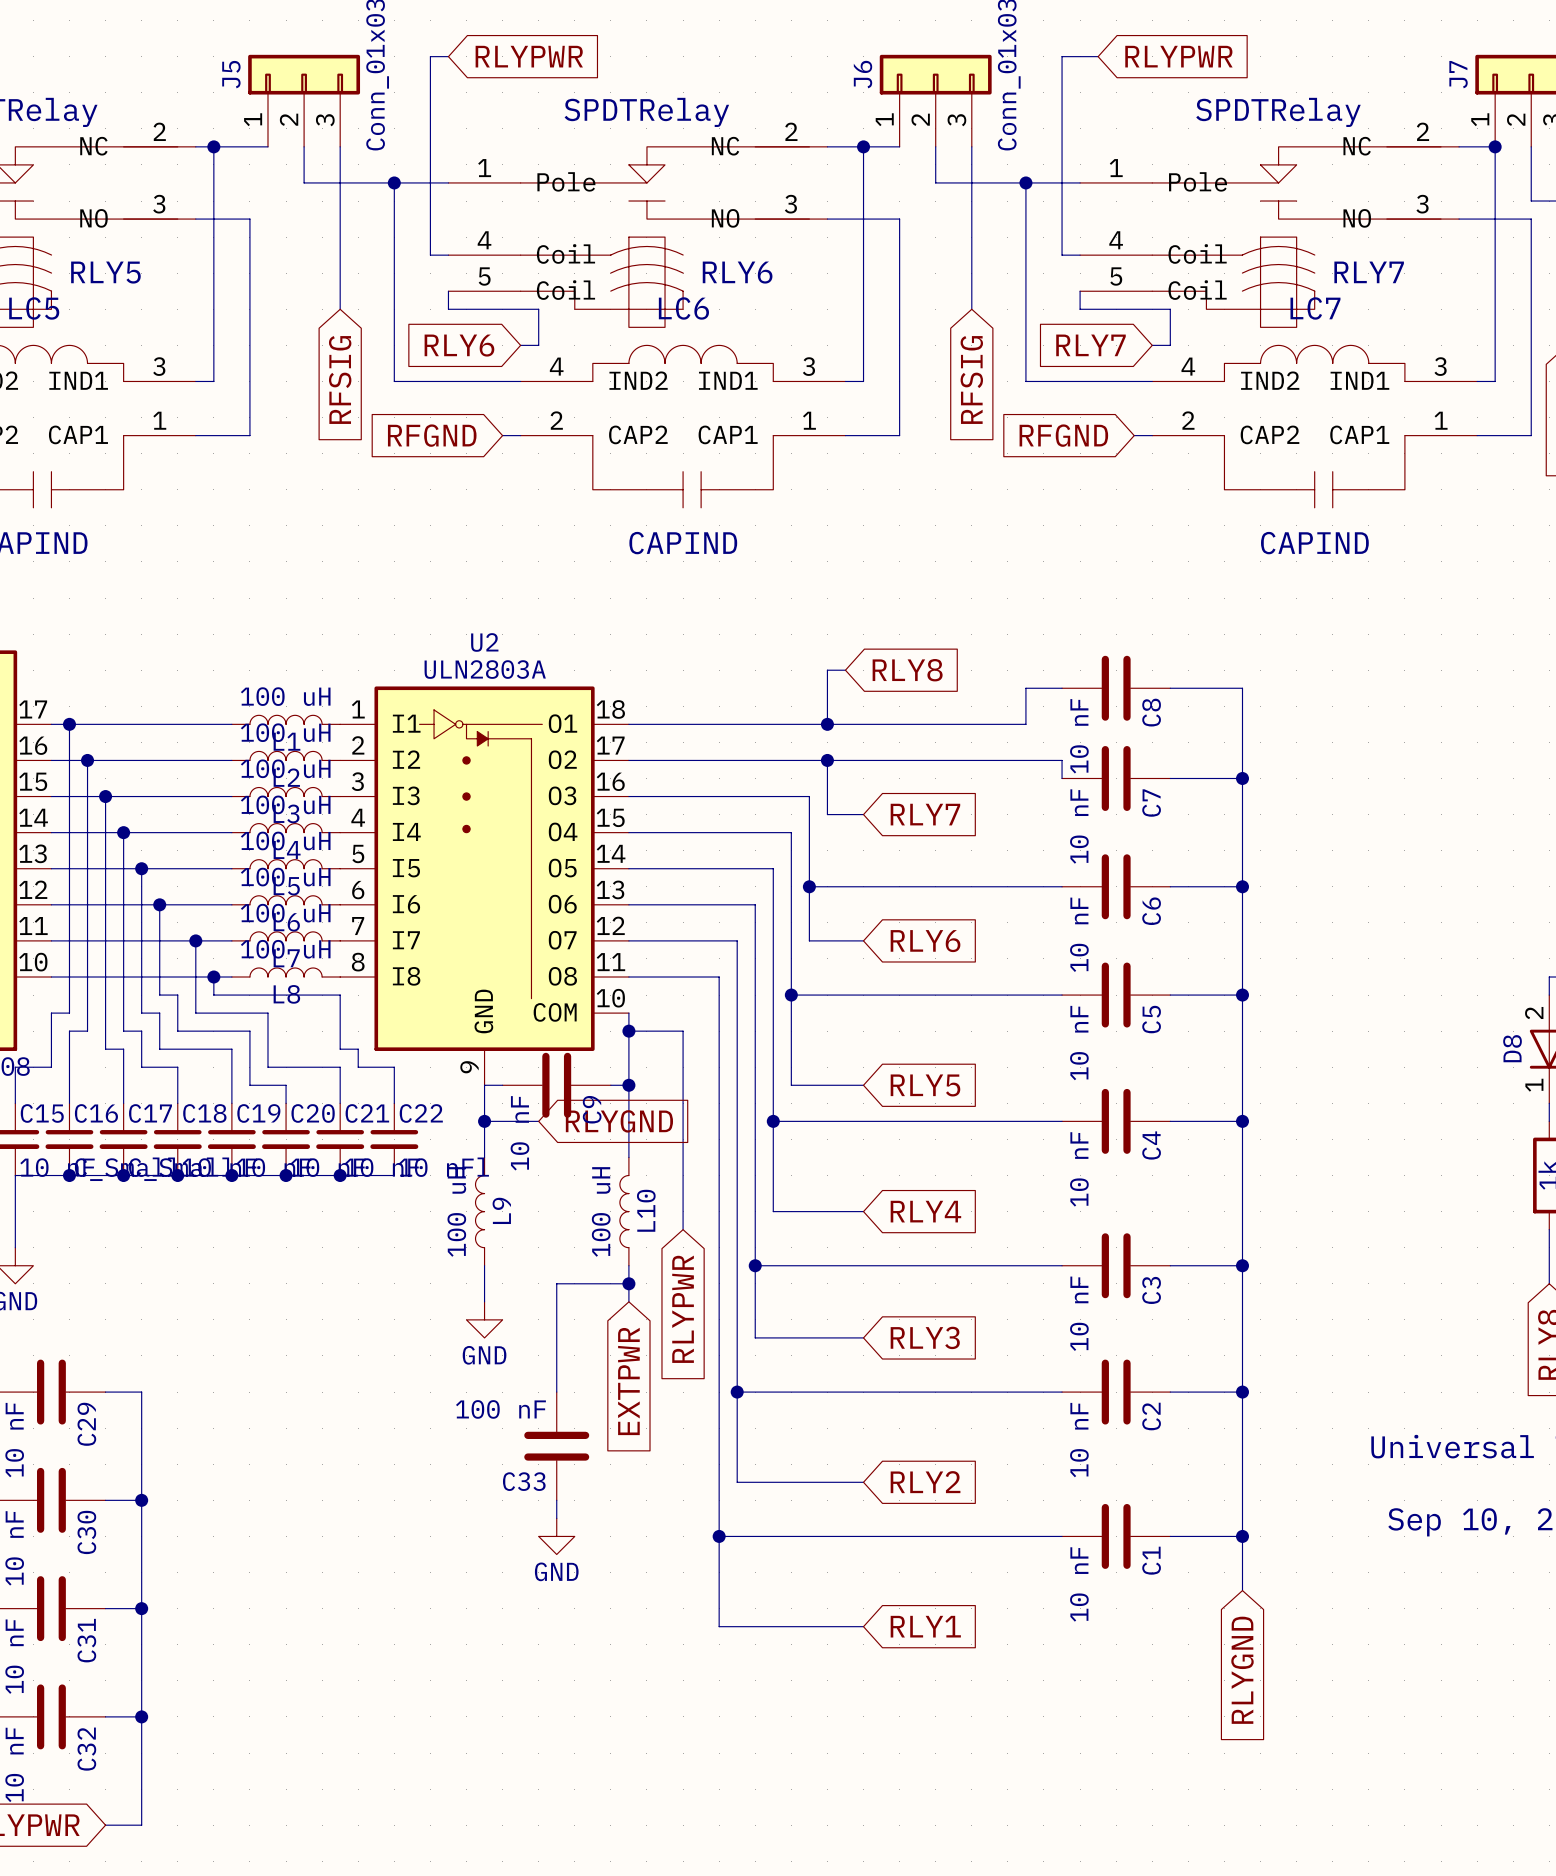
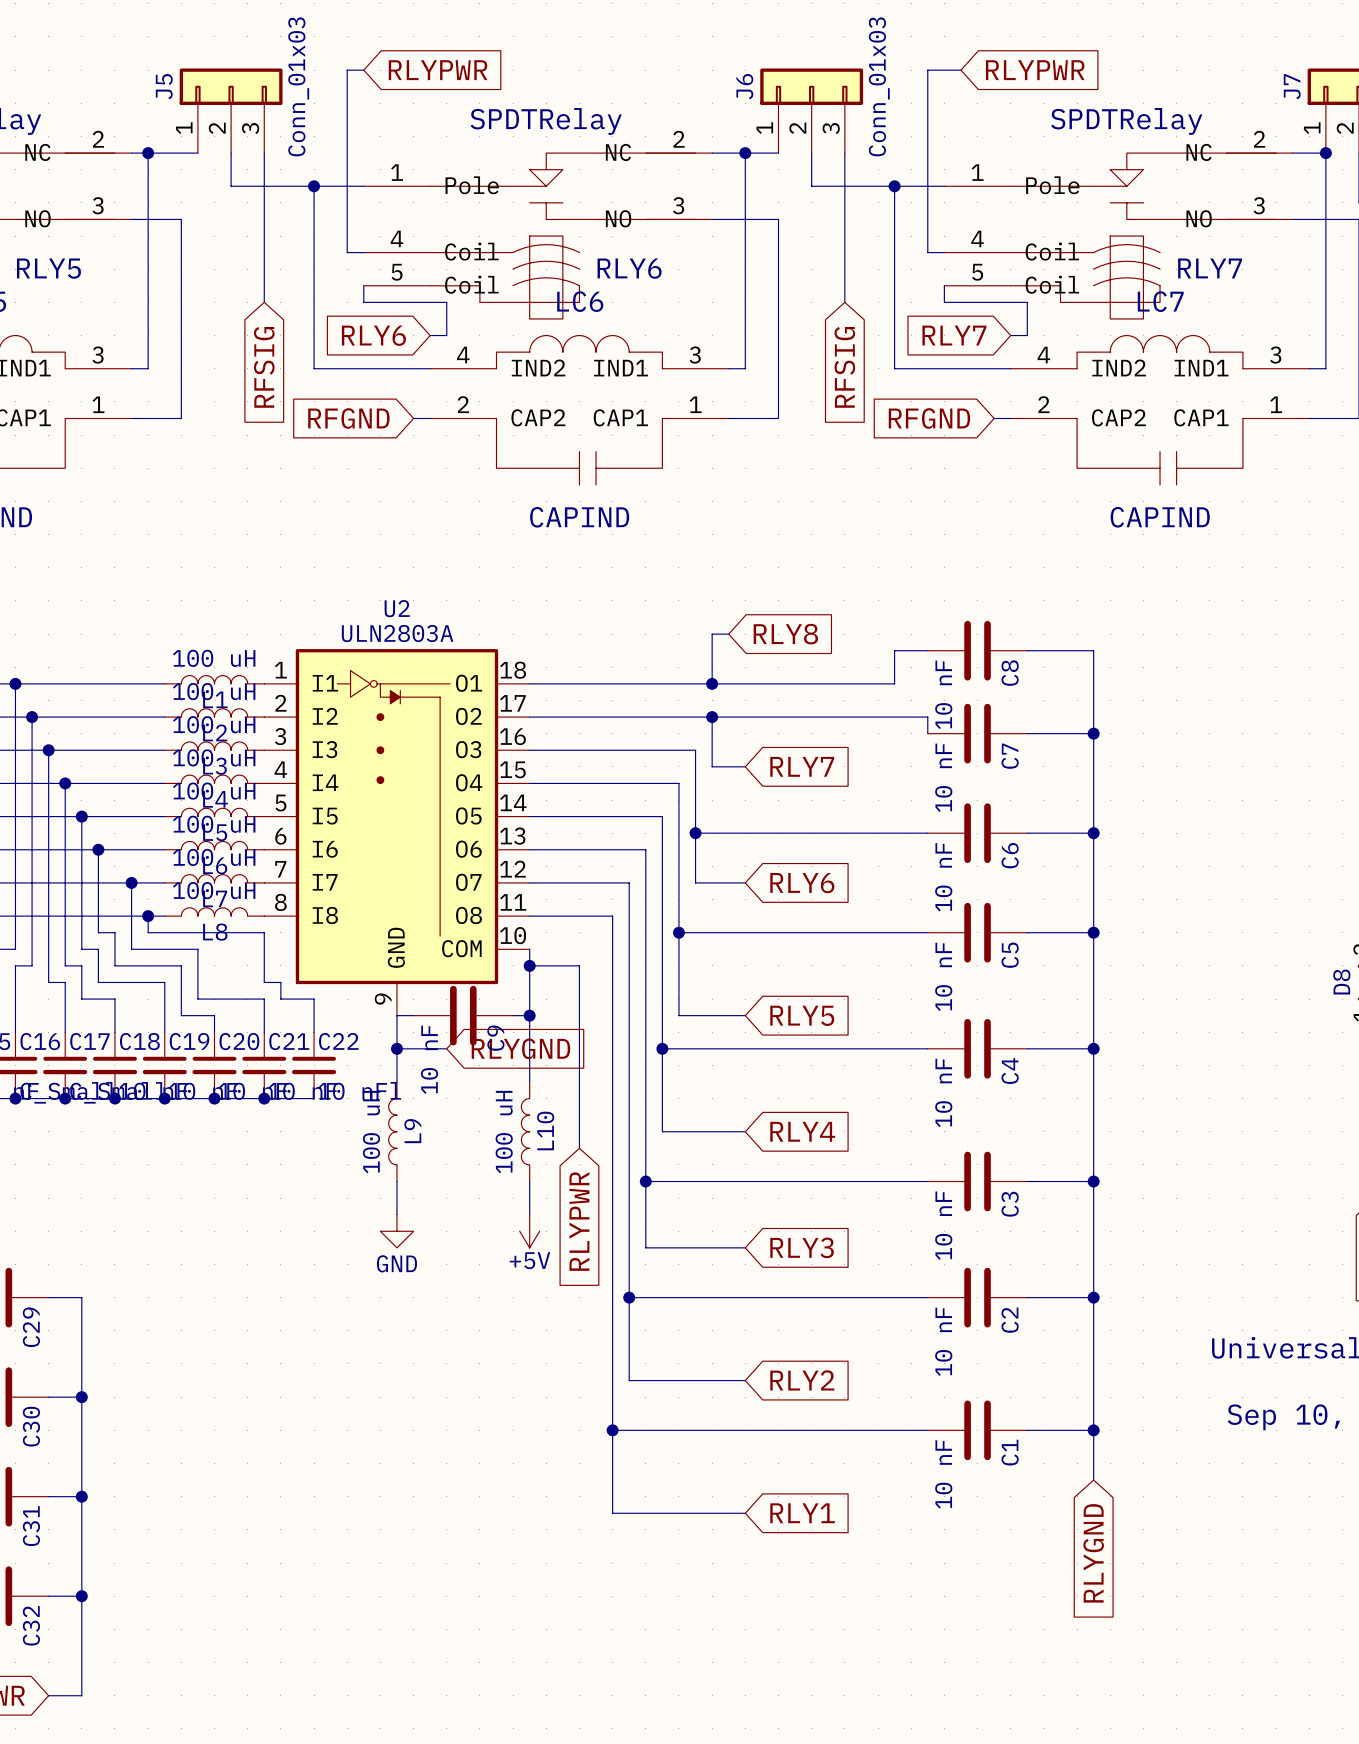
wire: (628, 1283) (556, 1283) (556, 1392) -> none
junction: (628, 1283) -> none
power symbol: none -> +5V (529, 1231)
global label: EXTPWR (628, 1381) -> none
C33: 100 nF (556, 1446) -> none
wire: (556, 1500) (556, 1518) -> none
power symbol: GND (556, 1536) -> none

